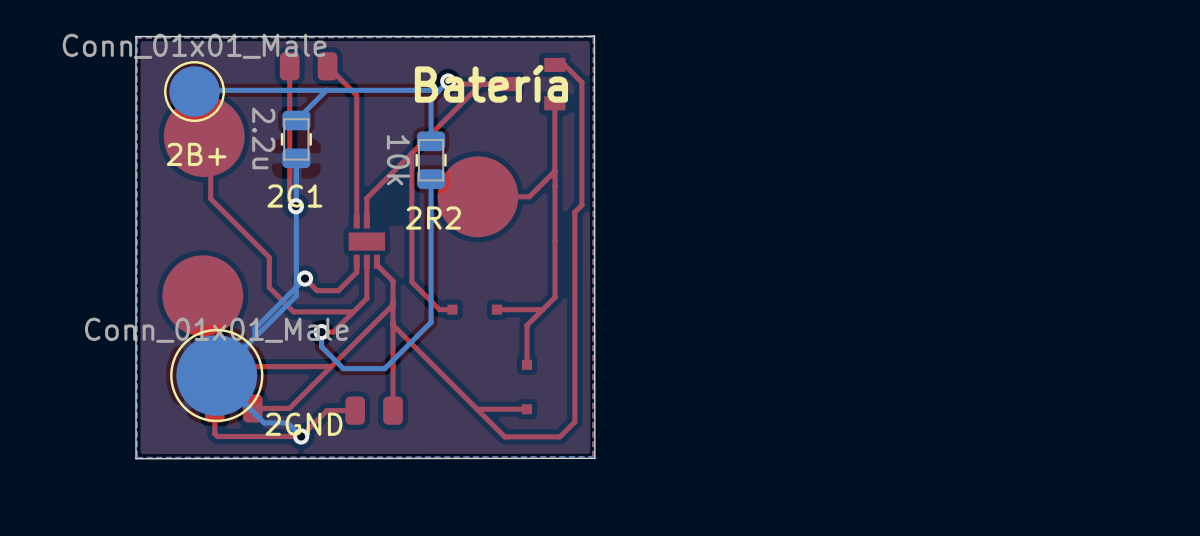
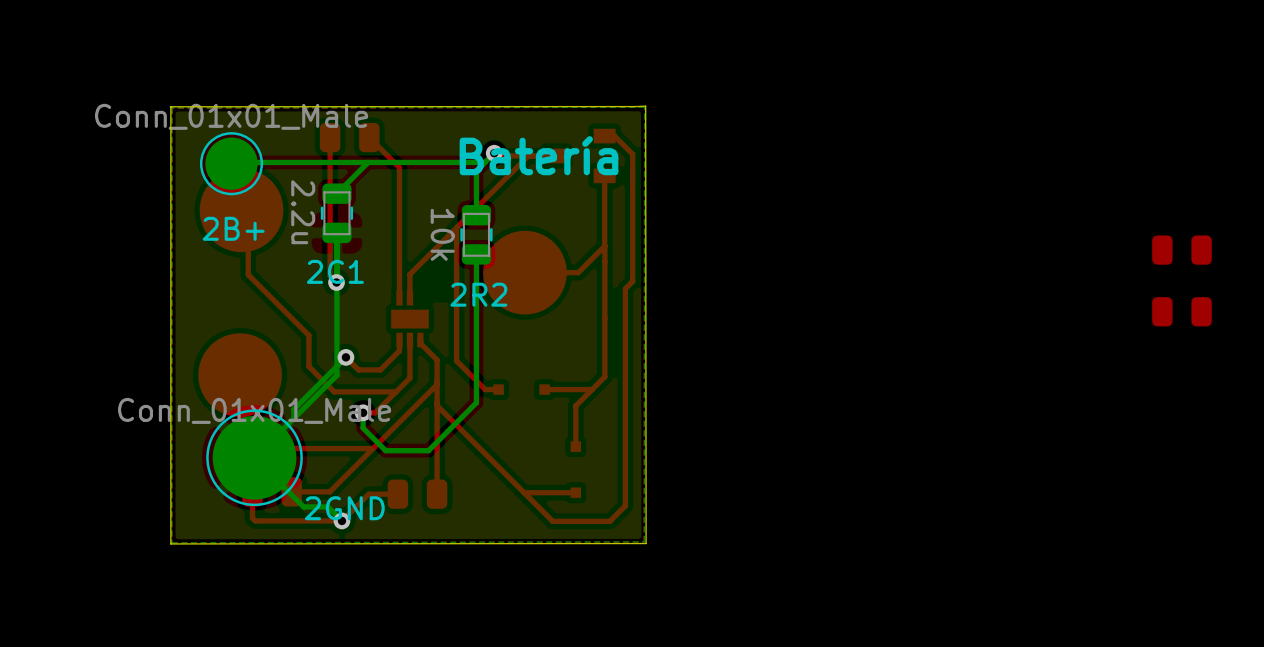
part: none -> (1181, 250)
part: none -> (1181, 311)

